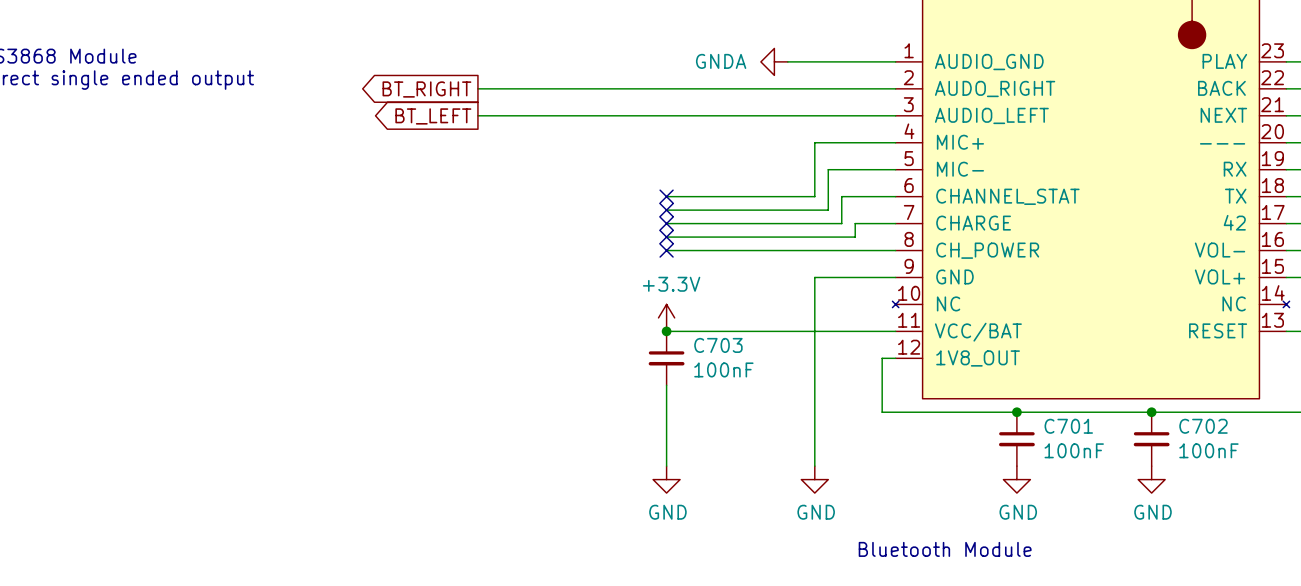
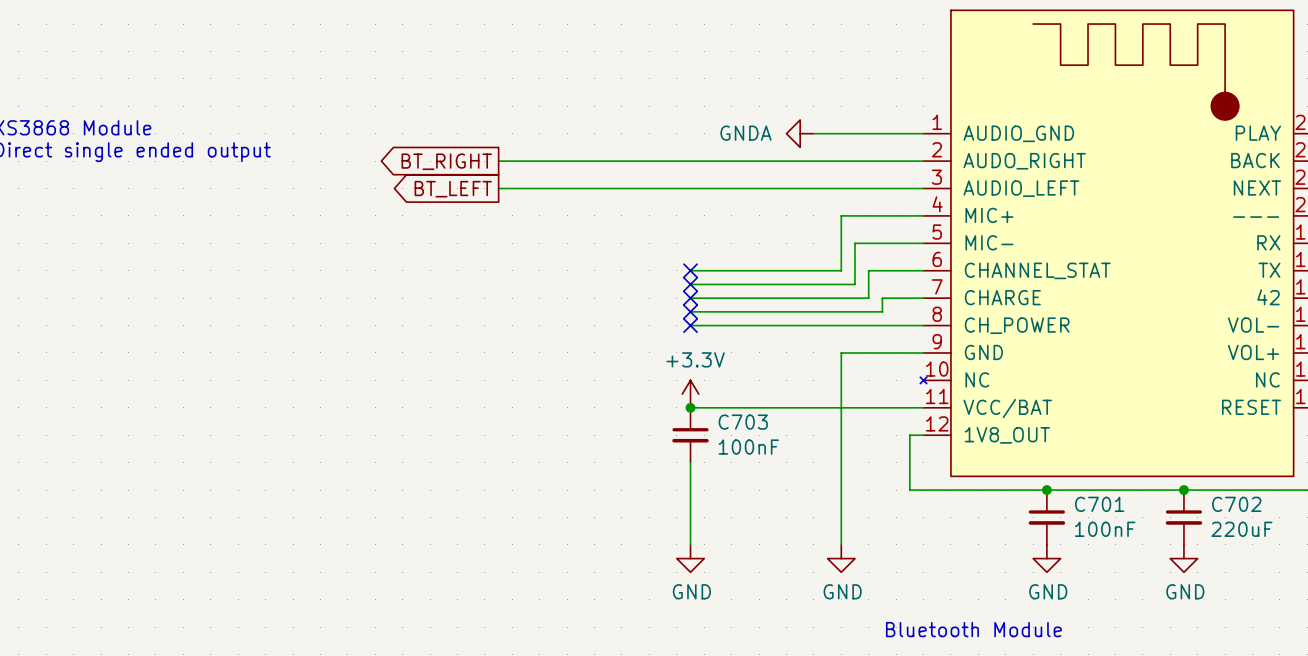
C702 value: 100nF (1208, 450) -> 220uF (1241, 529)

